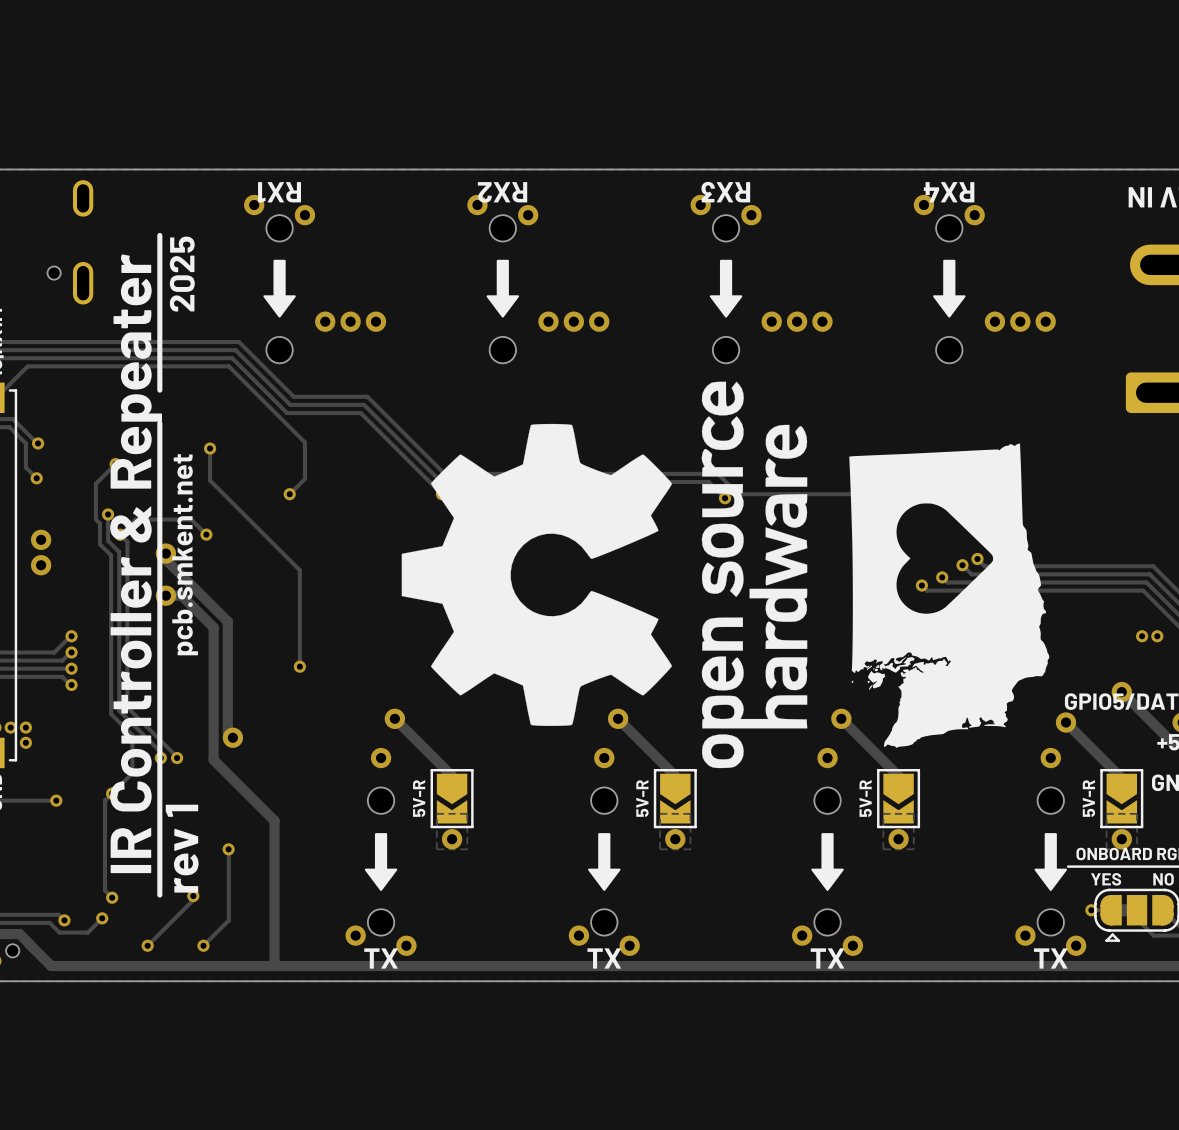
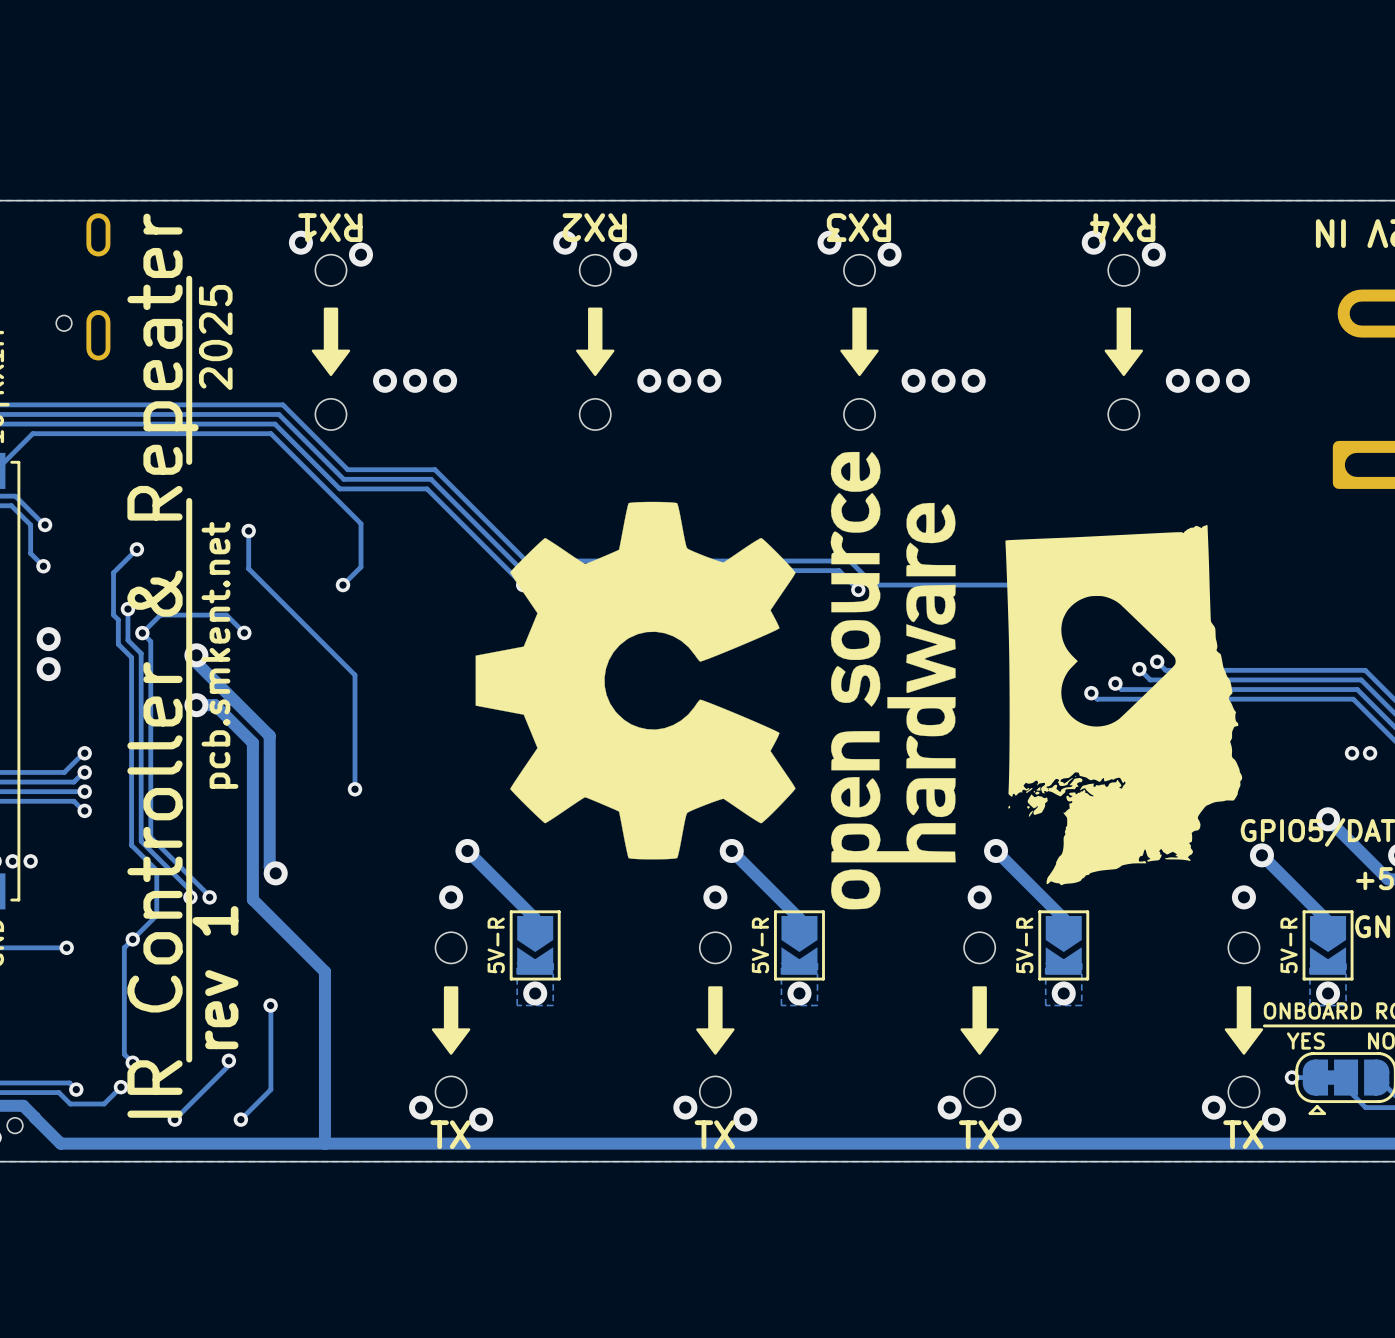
via: (25, 742) -> none

